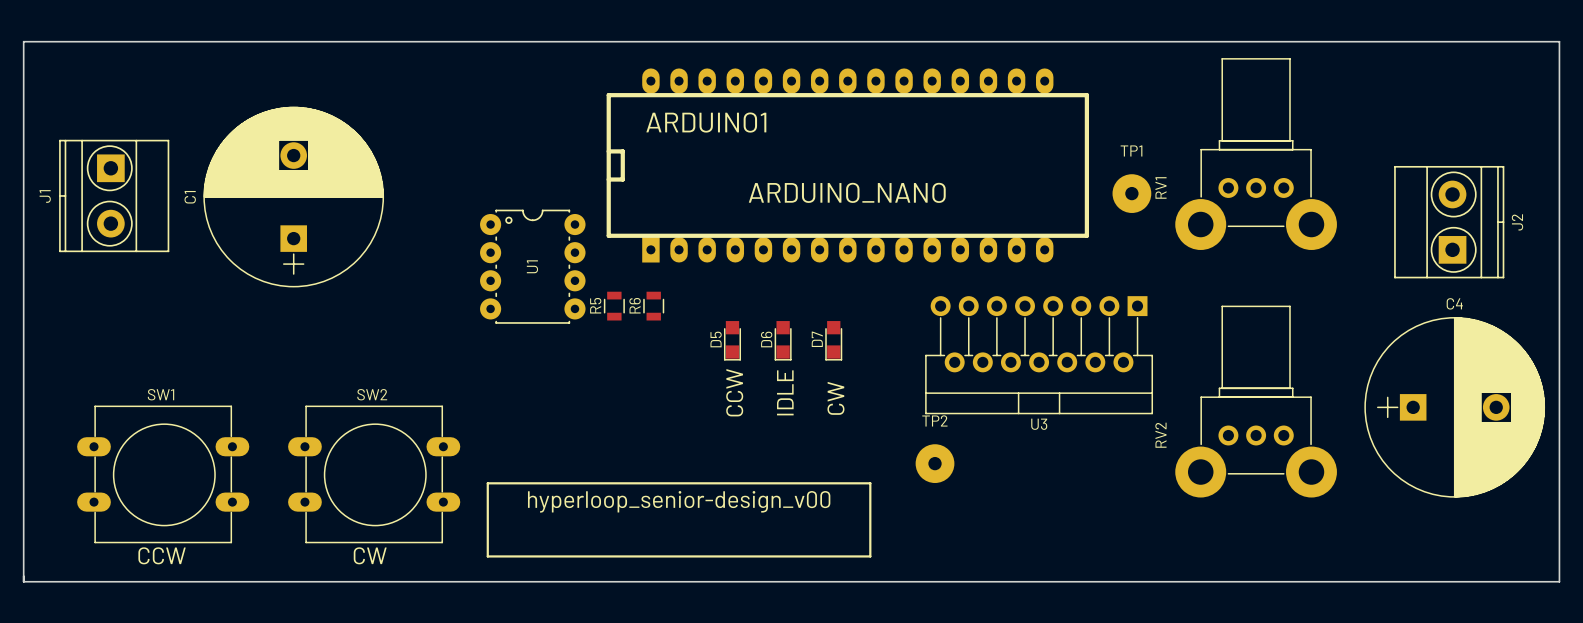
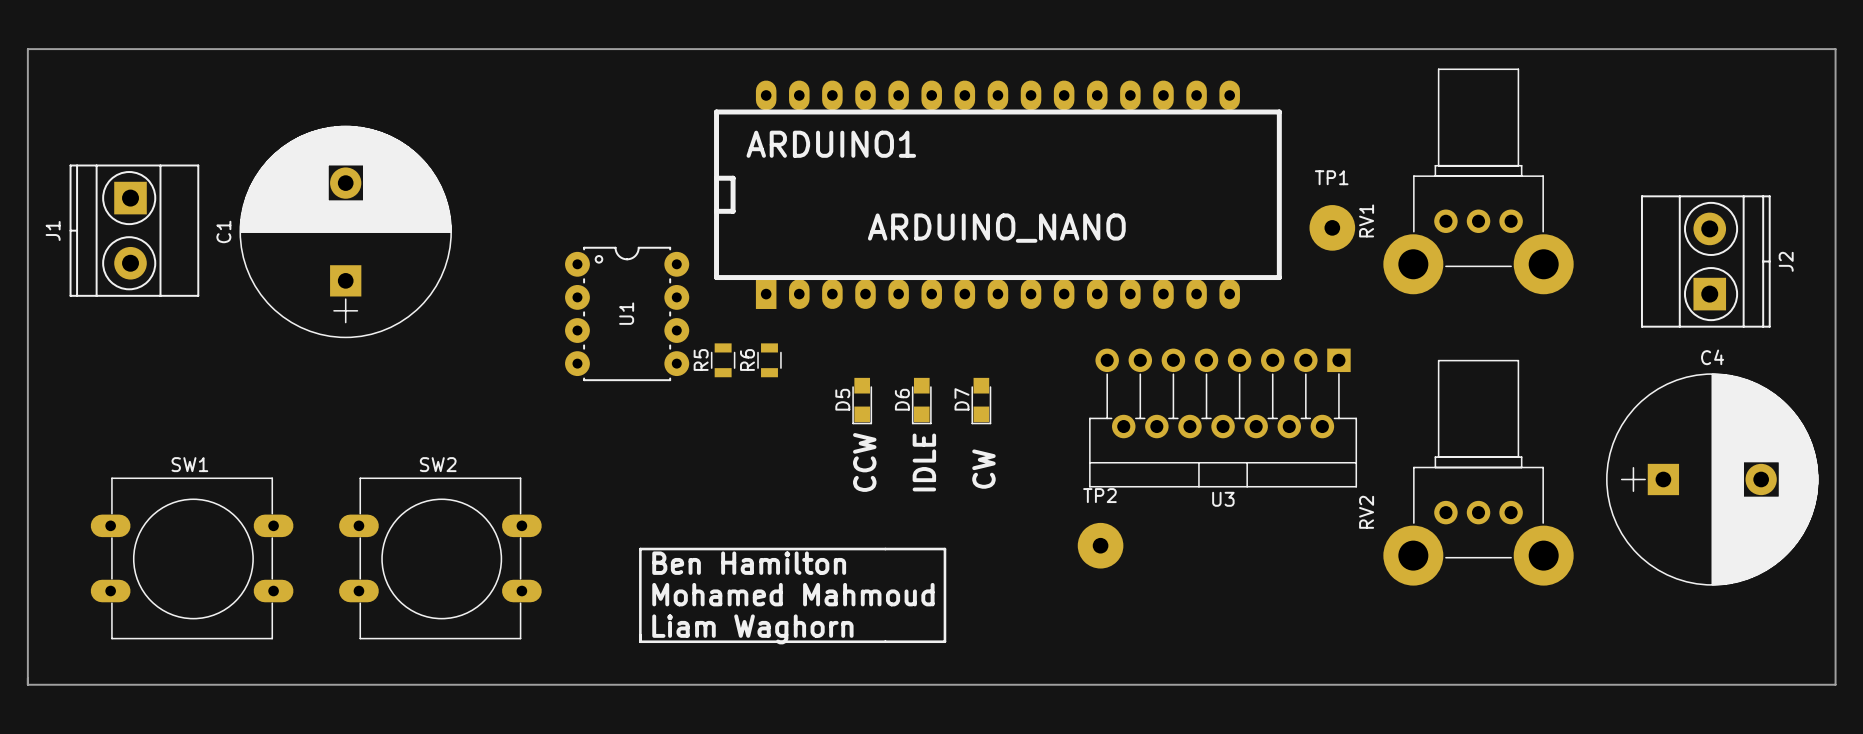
text: none -> Ben Hamilton (749, 563)
line: (487, 483) (870, 483) (870, 556) (487, 556) (487, 483) -> (640, 549) (640, 641) (944, 641) (944, 549) (640, 549)
text: hyperloop_senior-design_v00 (679, 501) -> none
text: none -> Mohamed Mahmoud (793, 594)
text: none -> Liam Waghorn (752, 629)
text: CCW (162, 555) -> none
text: CW (370, 555) -> none

